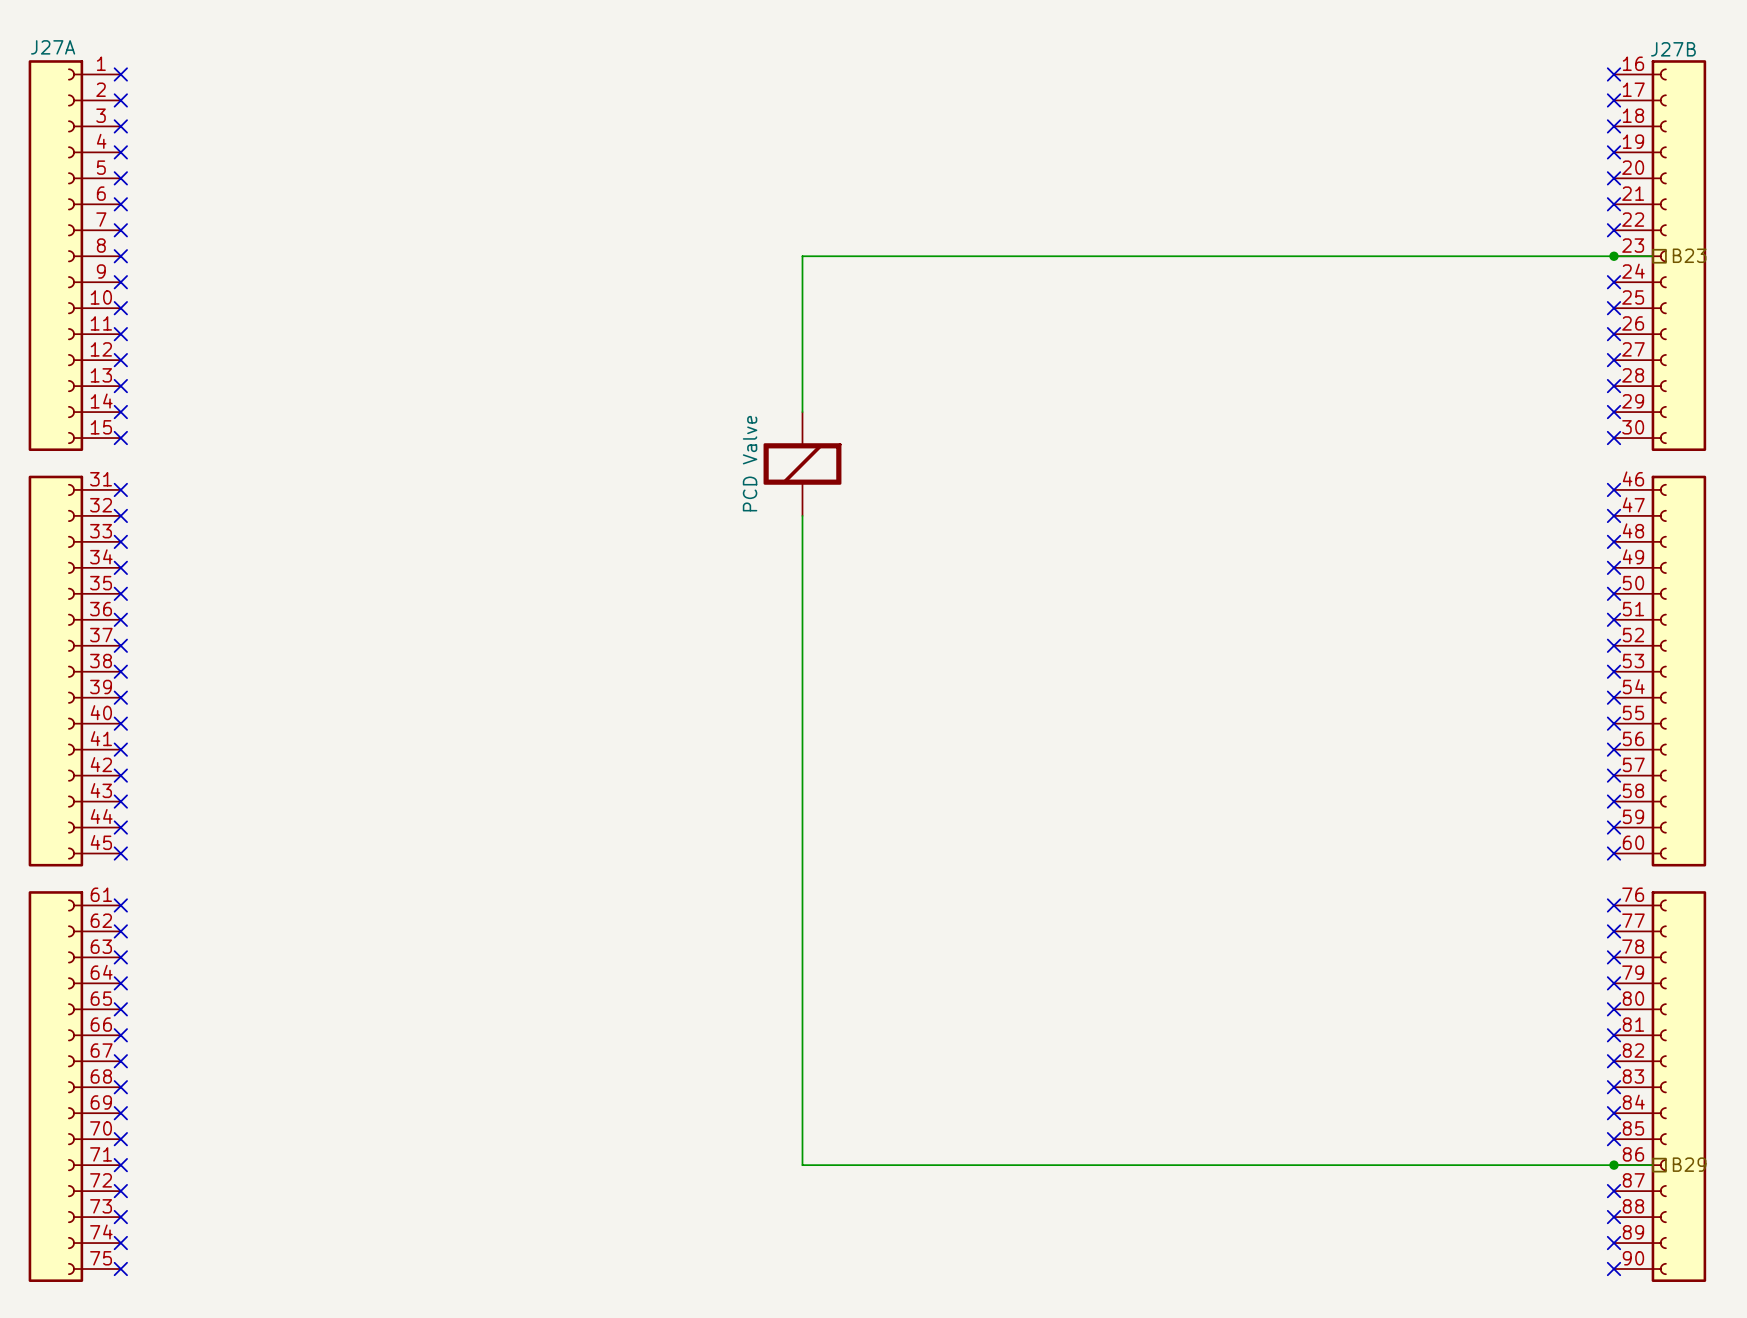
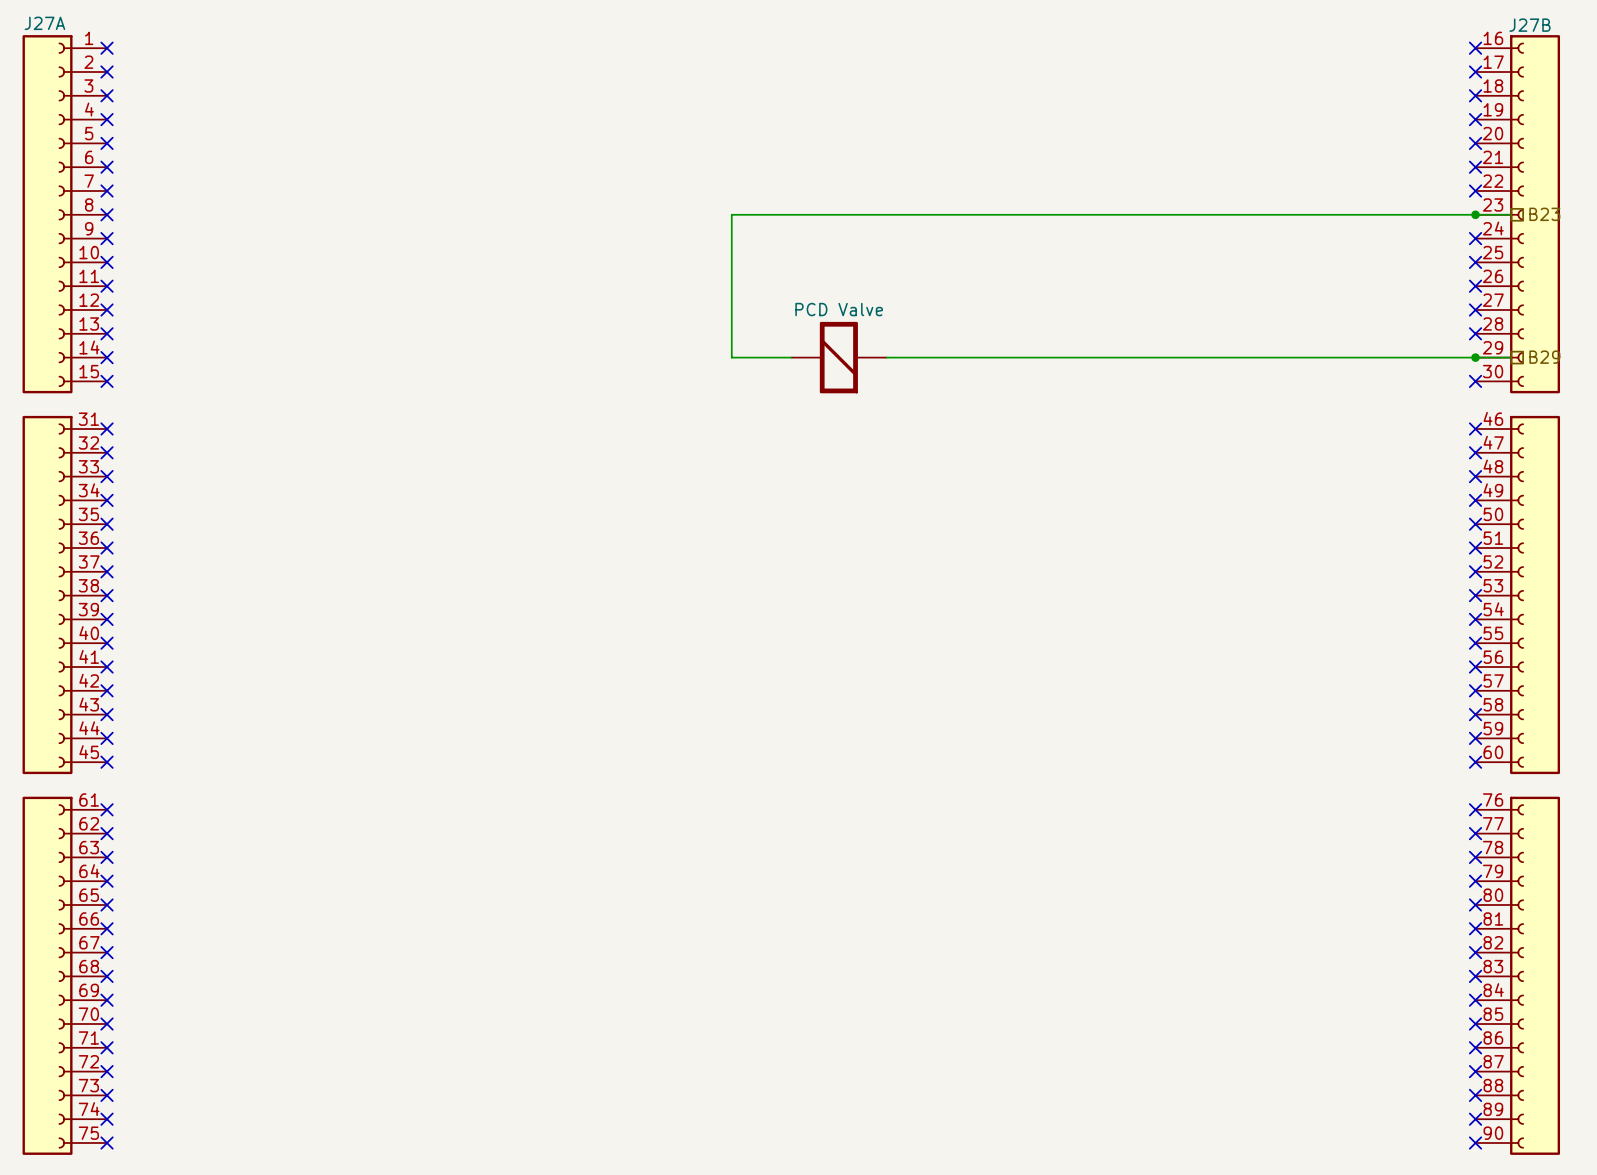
hierarchical label: none -> B29 (1544, 357)
wire: none -> (731, 357) (791, 357)
wire: none -> (886, 357) (1511, 357)
junction: none -> (1475, 357)
no-connect mark: (1613, 412) -> none
part rotation: 0° (802, 463) -> 90° clockwise (838, 357)
part position: (802, 463) -> (838, 357)
wire: (802, 515) (802, 1165) (1652, 1165) -> none
hierarchical label: B29 (1689, 1164) -> none
junction: (1613, 1165) -> none
no-connect mark: none -> (1475, 1047)

